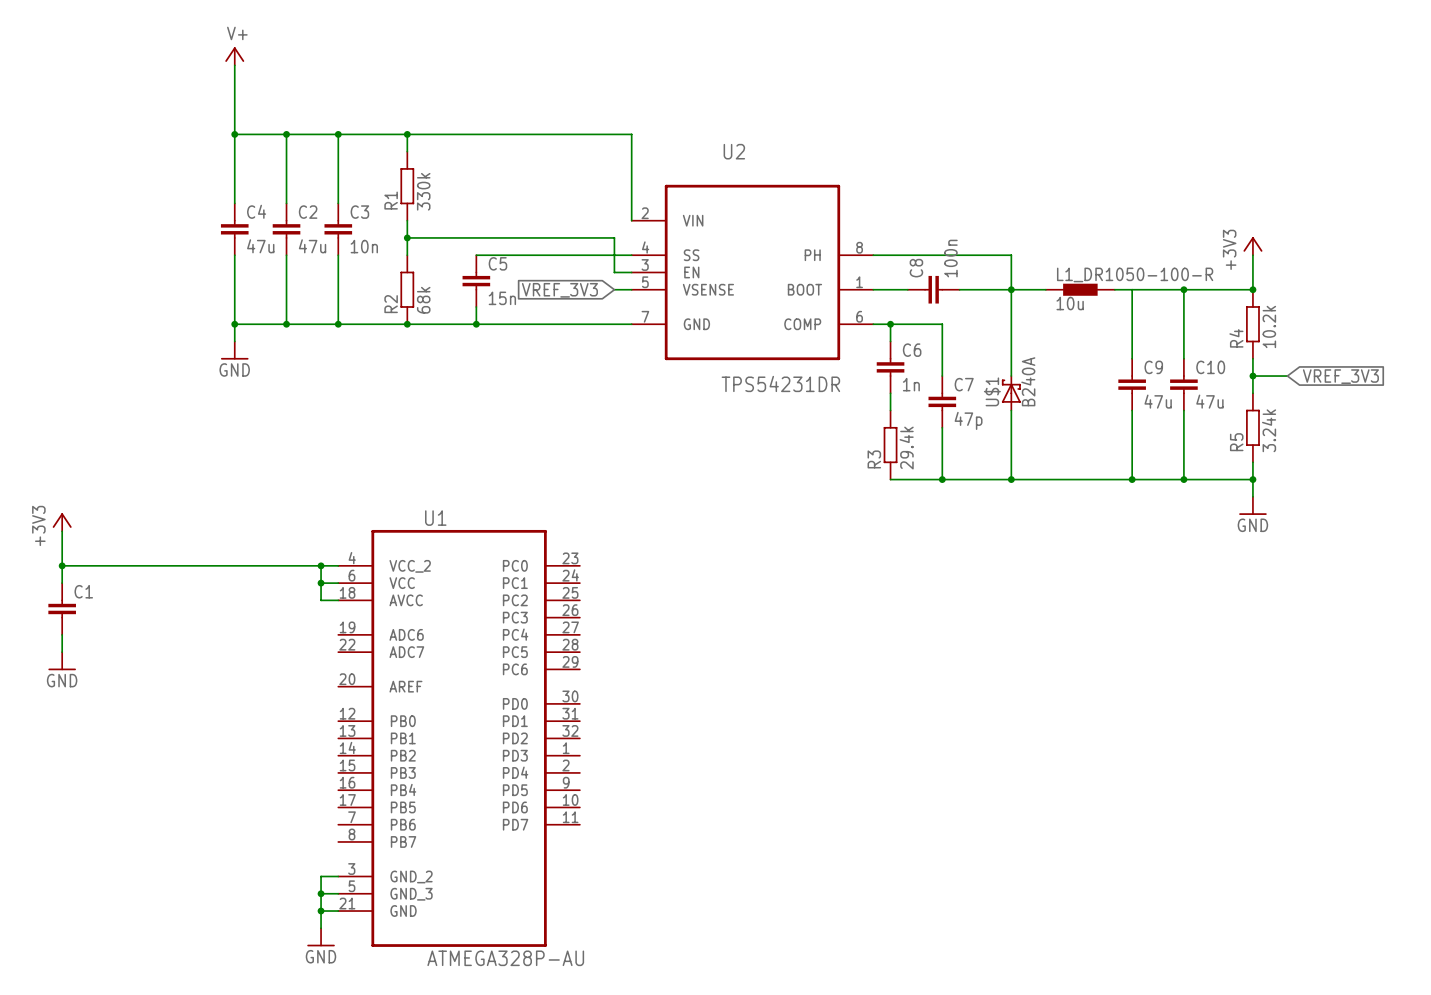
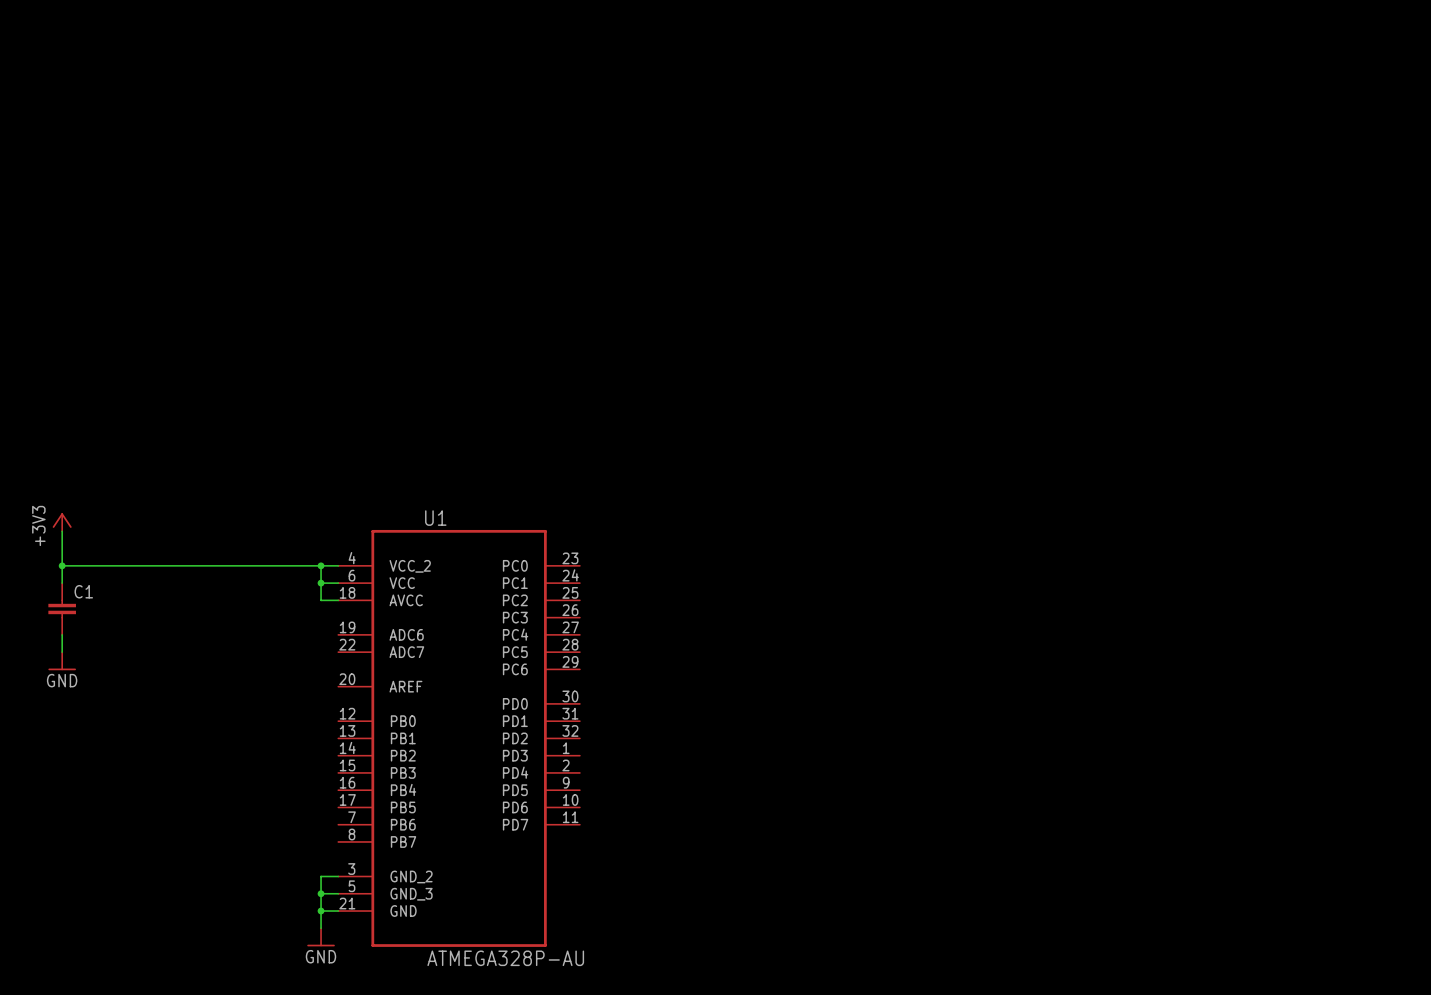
power symbol: V+ (234, 56) -> none
wire: (234, 65) (234, 203) -> none
wire: (234, 134) (631, 134) (631, 220) -> none
junction: (234, 134) -> none
wire: (286, 134) (286, 203) -> none
junction: (286, 134) -> none
wire: (338, 134) (338, 203) -> none
junction: (338, 134) -> none
wire: (407, 134) (407, 151) -> none
junction: (407, 134) -> none
R1: 330k (407, 186) -> none
wire: (407, 220) (407, 255) -> none
C4: 47u (234, 229) -> none
C2: 47u (286, 229) -> none
C3: 10n (338, 229) -> none
wire: (407, 237) (614, 237) (614, 272) (631, 272) -> none
junction: (407, 237) -> none
power symbol: +3V3 (1252, 246) -> none
wire: (234, 255) (234, 341) -> none
wire: (286, 255) (286, 324) -> none
wire: (338, 255) (338, 324) -> none
wire: (476, 255) (631, 255) -> none
wire: (873, 255) (1011, 255) (1011, 376) -> none
wire: (1252, 255) (1252, 289) (1114, 289) -> none
U2: TPS54231DR (752, 272) -> none
C5: 15n (476, 281) -> none
R2: 68k (407, 289) -> none
wire: (614, 289) (631, 289) -> none
wire: (873, 289) (907, 289) -> none
C8: 100n (933, 289) -> none
wire: (959, 289) (1045, 289) -> none
junction: (1011, 289) -> none
L1_DR1050-100-R: 10u (1080, 289) -> none
wire: (1132, 289) (1132, 358) -> none
wire: (1183, 289) (1183, 358) -> none
junction: (1183, 289) -> none
junction: (1252, 289) -> none
global label: VREF_3V3 (559, 290) -> none
wire: (476, 306) (476, 324) -> none
wire: (234, 324) (631, 324) -> none
junction: (234, 324) -> none
junction: (286, 324) -> none
junction: (338, 324) -> none
junction: (407, 324) -> none
junction: (476, 324) -> none
wire: (873, 324) (942, 324) (942, 376) -> none
wire: (890, 324) (890, 341) -> none
junction: (890, 324) -> none
R4: 10.2k (1252, 324) -> none
power symbol: GND (234, 350) -> none
wire: (1252, 358) (1252, 393) -> none
C6: 1n (890, 367) -> none
wire: (1252, 376) (1287, 376) -> none
junction: (1252, 376) -> none
global label: VREF_3V3 (1340, 376) -> none
C9: 47u (1132, 384) -> none
C10: 47u (1183, 384) -> none
wire: (890, 393) (890, 410) -> none
U$1: B240A (1011, 393) -> none
C7: 47p (942, 401) -> none
wire: (1011, 410) (1011, 479) -> none
wire: (1132, 410) (1132, 479) -> none
wire: (1183, 410) (1183, 479) -> none
wire: (942, 427) (942, 479) -> none
R5: 3.24k (1252, 427) -> none
R3: 29.4k (890, 445) -> none
wire: (1252, 462) (1252, 496) -> none
wire: (890, 479) (1252, 479) -> none
junction: (942, 479) -> none
junction: (1011, 479) -> none
junction: (1132, 479) -> none
junction: (1183, 479) -> none
junction: (1252, 479) -> none
power symbol: GND (1252, 505) -> none

